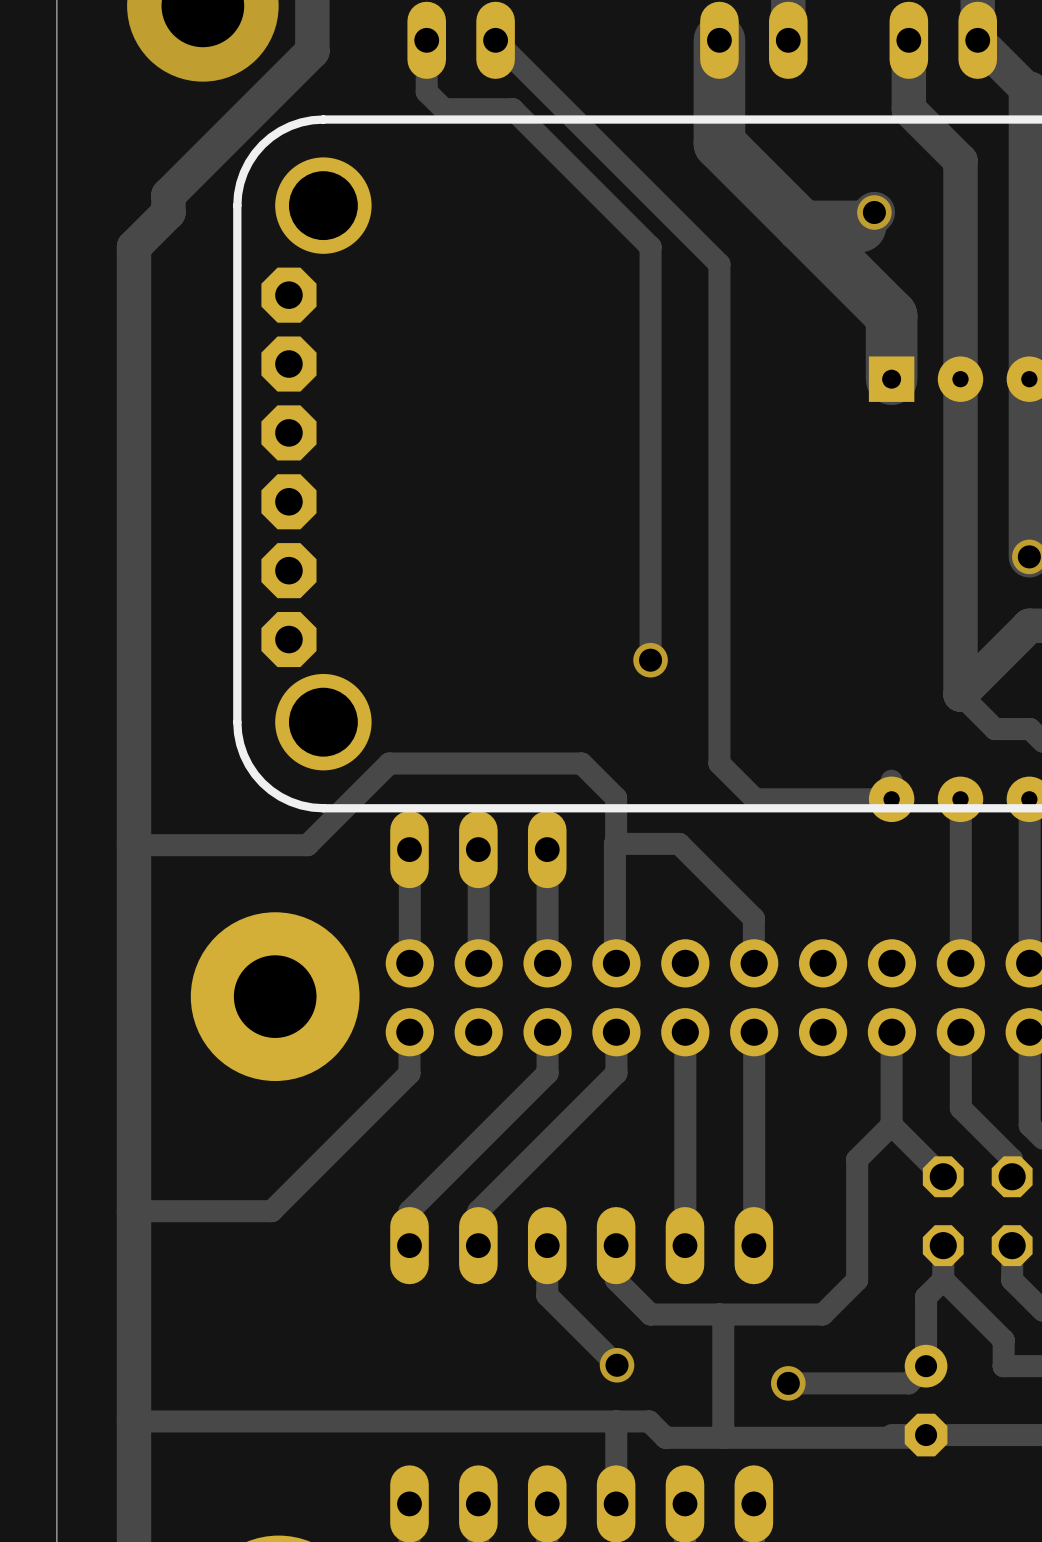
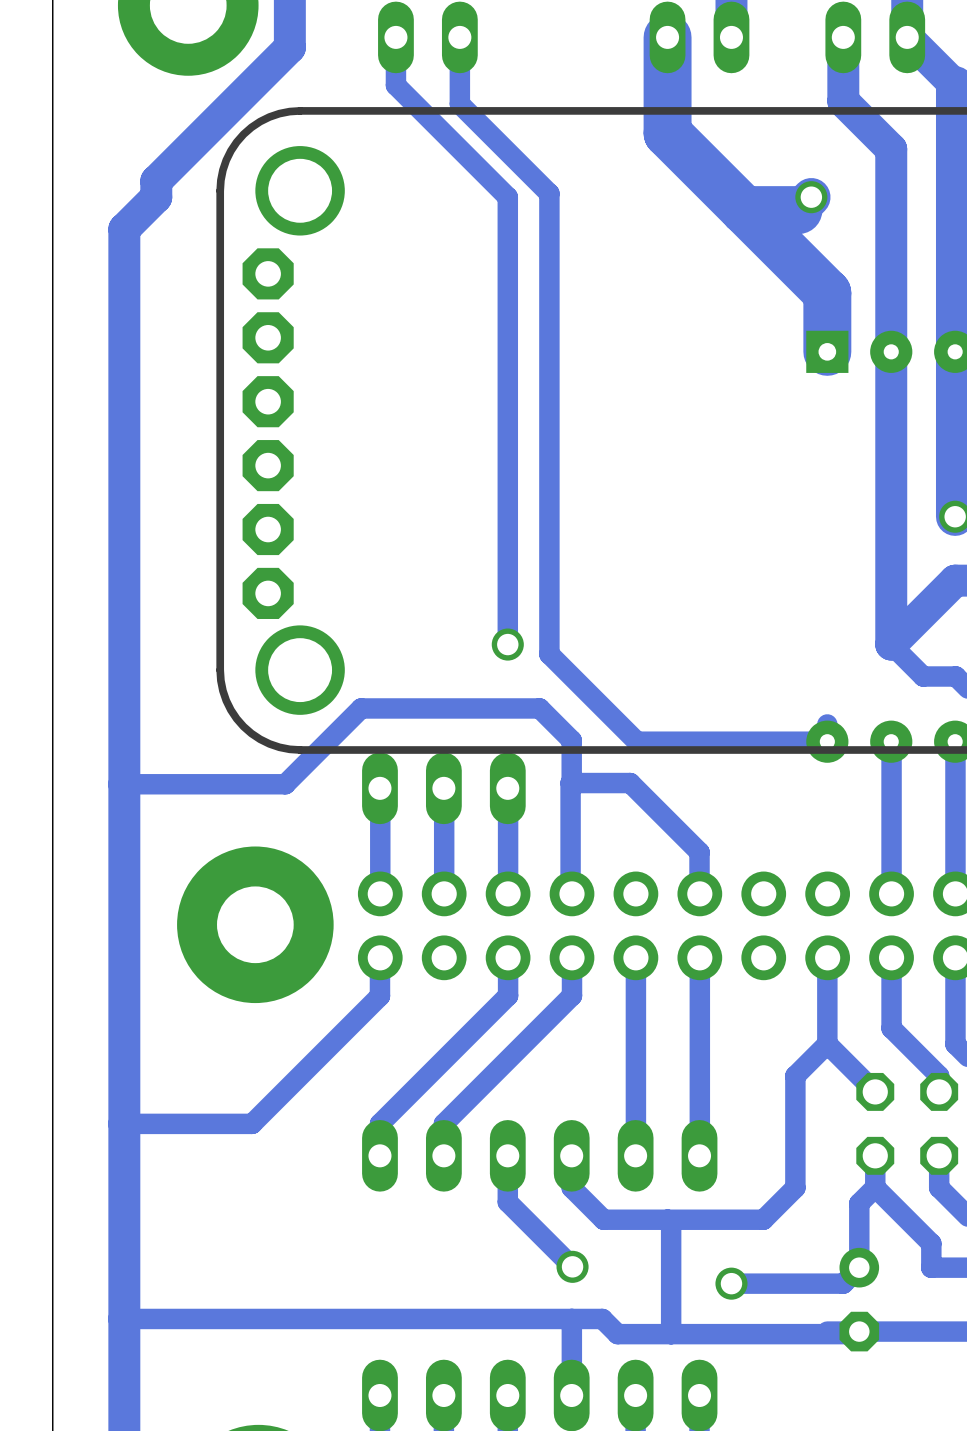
track: (495, 40) (719, 264) (719, 763) (755, 799) -> (459, 37) (459, 104) (549, 193) (549, 654) (636, 741) (700, 741)
track: (443, 109) (512, 109) (650, 246) (650, 660) -> (411, 101) (507, 197) (507, 644)
via position: (650, 660) -> (507, 644)

